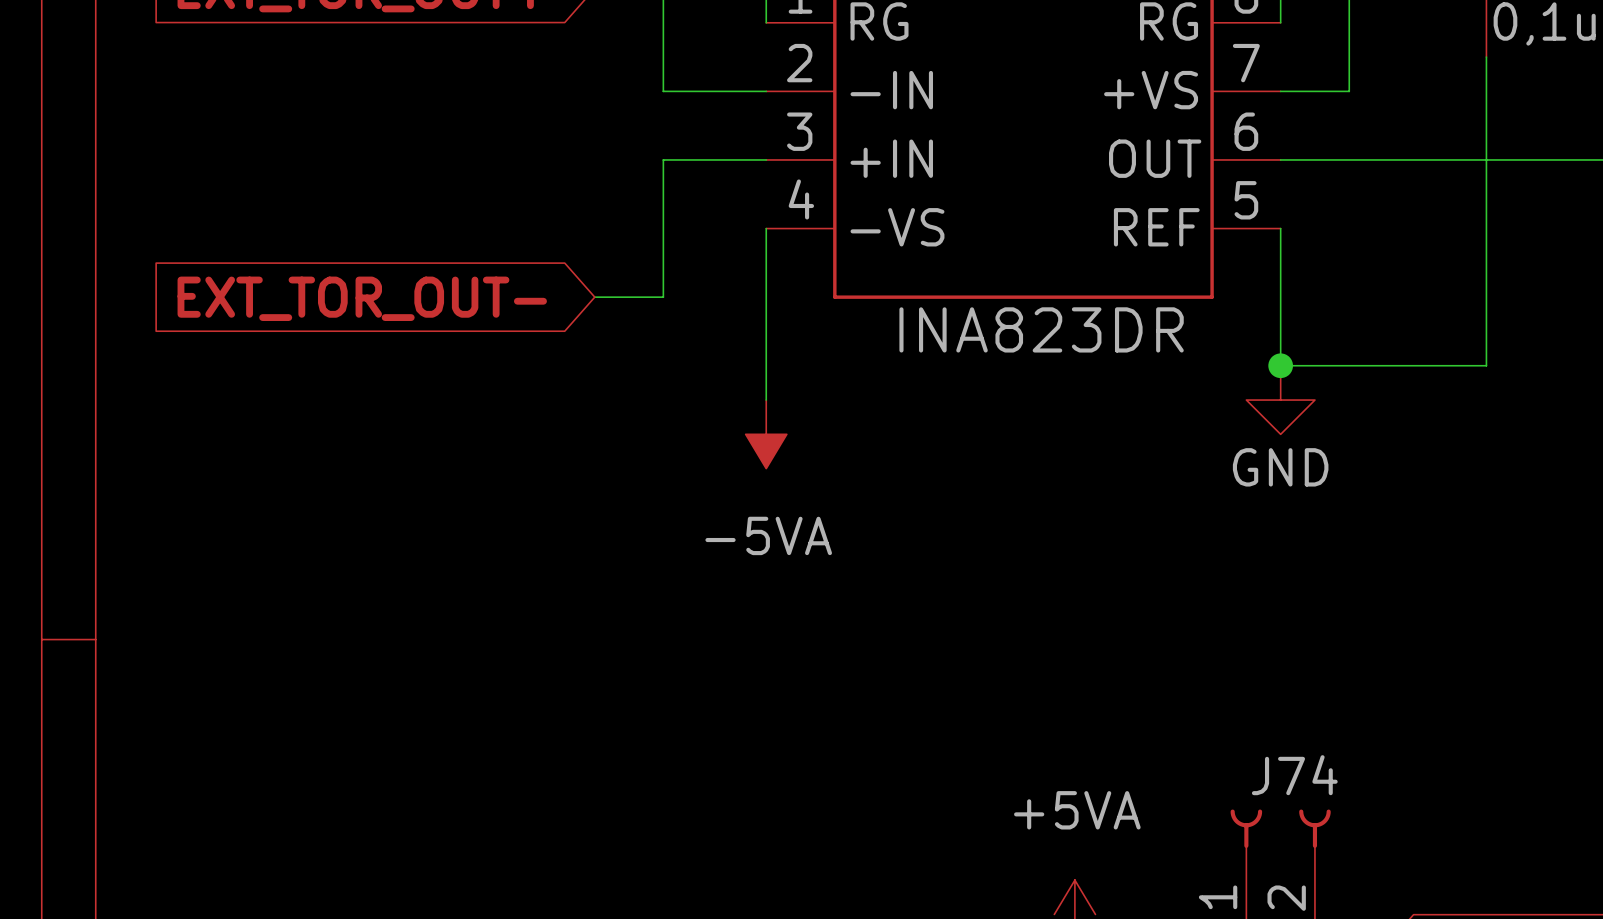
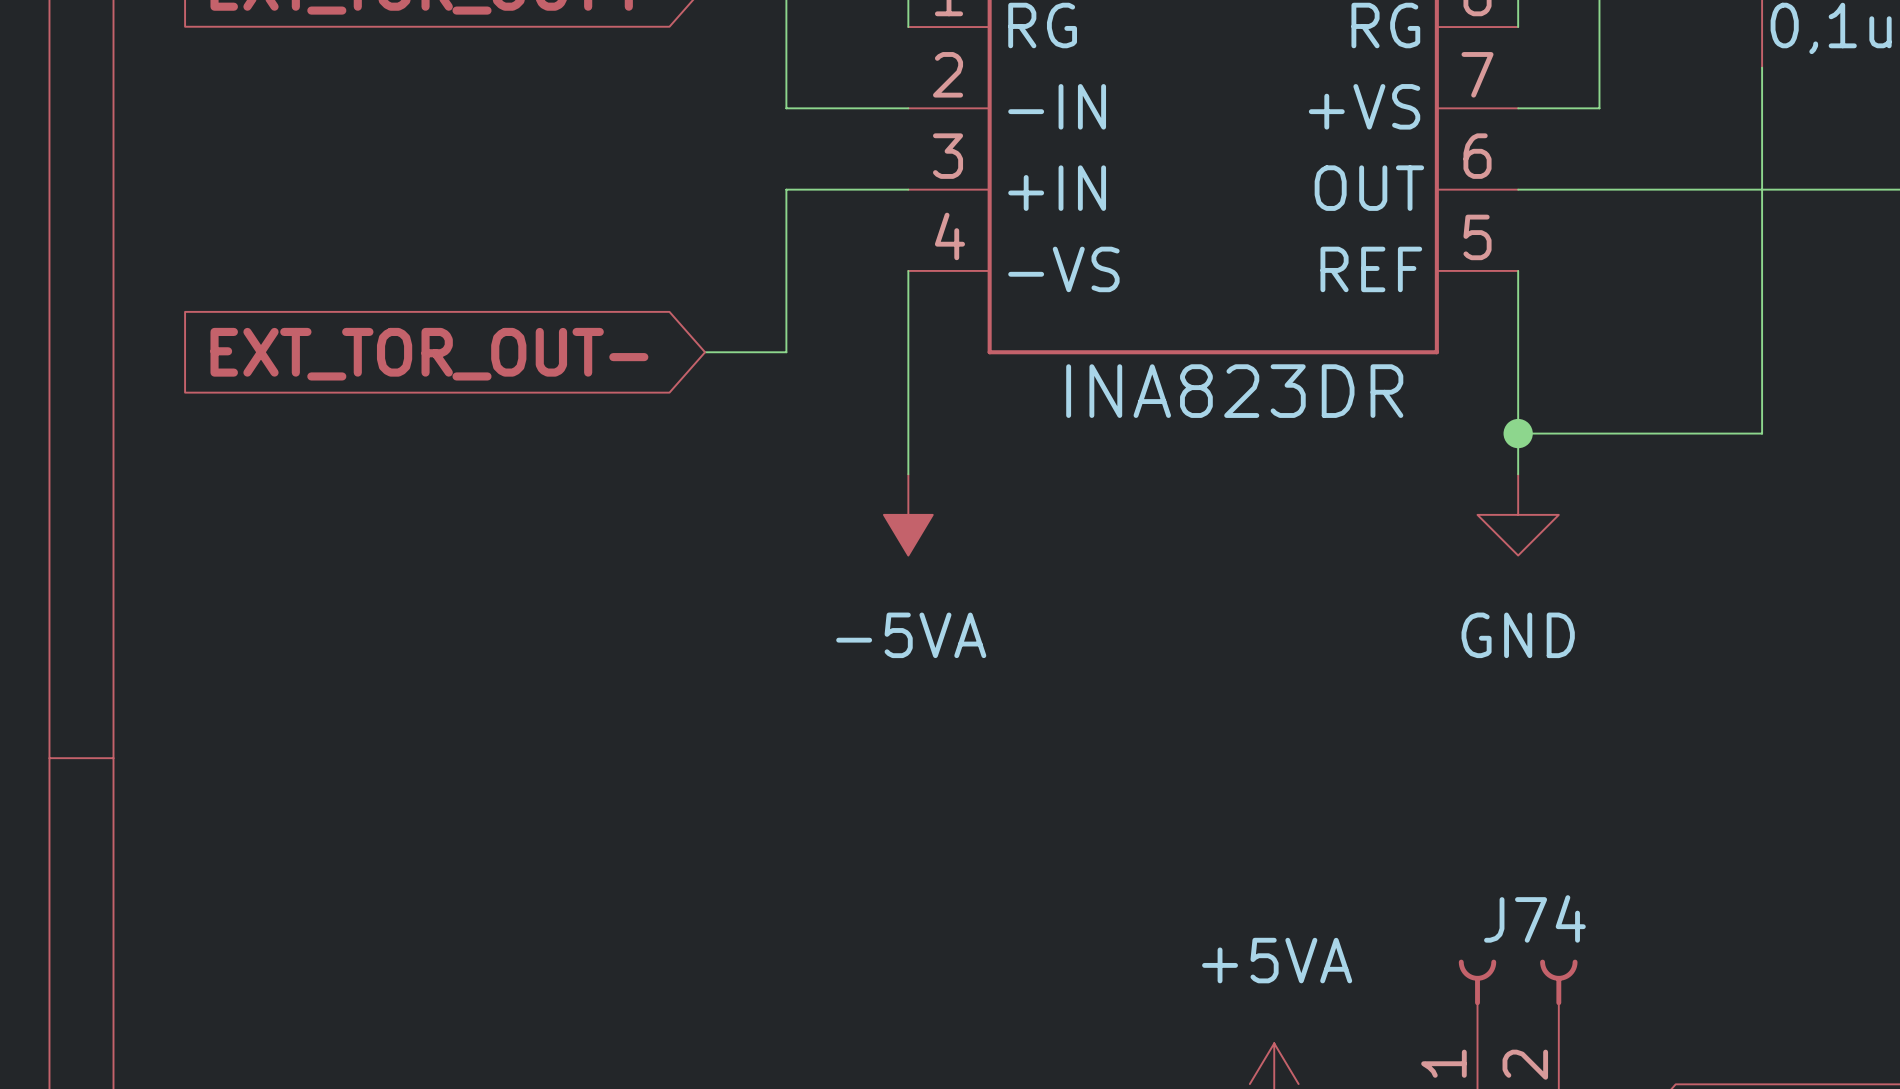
power symbol position: GND (1280, 400) -> GND (1518, 514)
power symbol text position: GND (1280, 467) -> GND (1518, 635)

